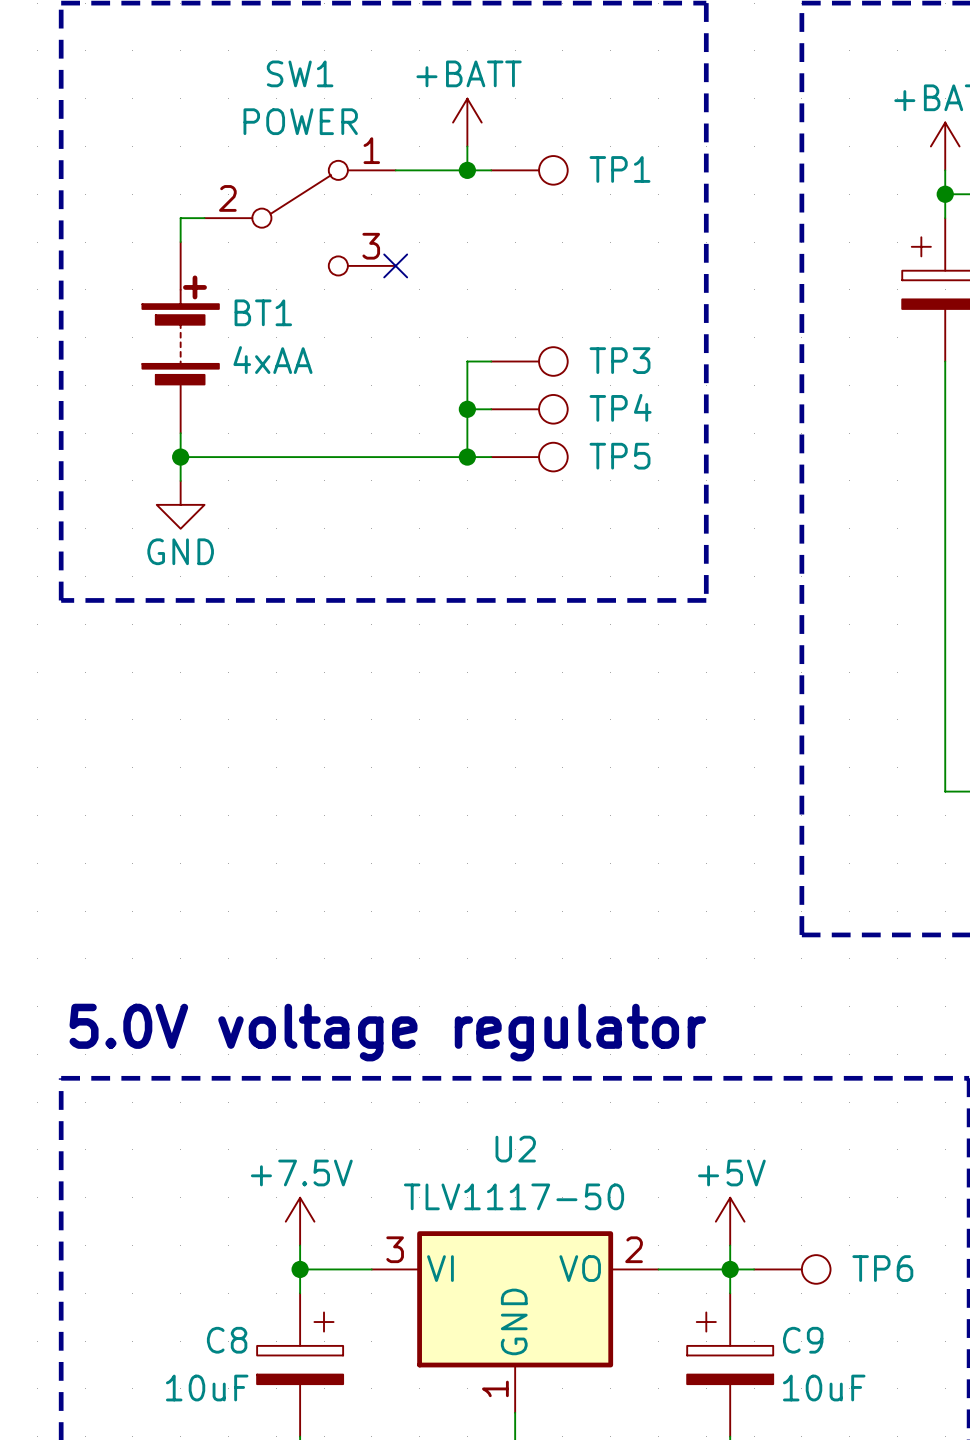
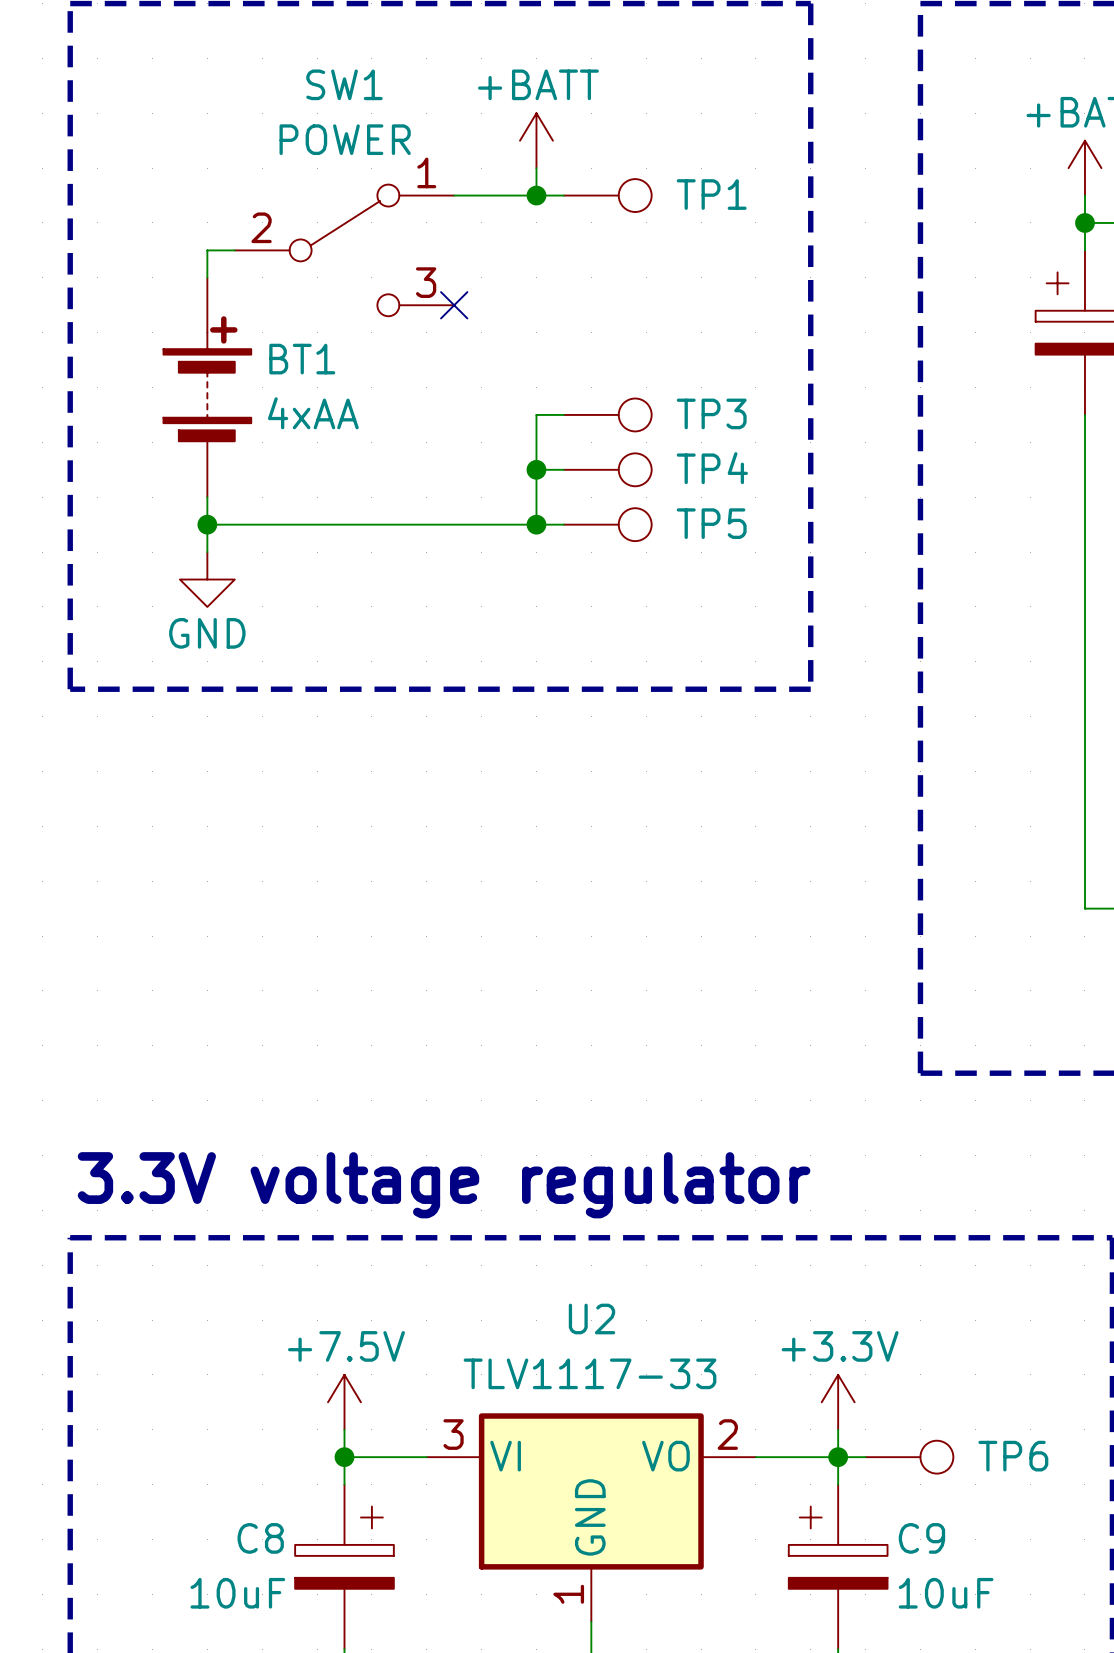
text: 5.0V voltage regulator (387, 1032) -> 3.3V voltage regulator (444, 1185)
U2 value: TLV1117-50 (514, 1196) -> TLV1117-33 (590, 1373)
power symbol: +5V (730, 1221) -> +3.3V (838, 1402)

